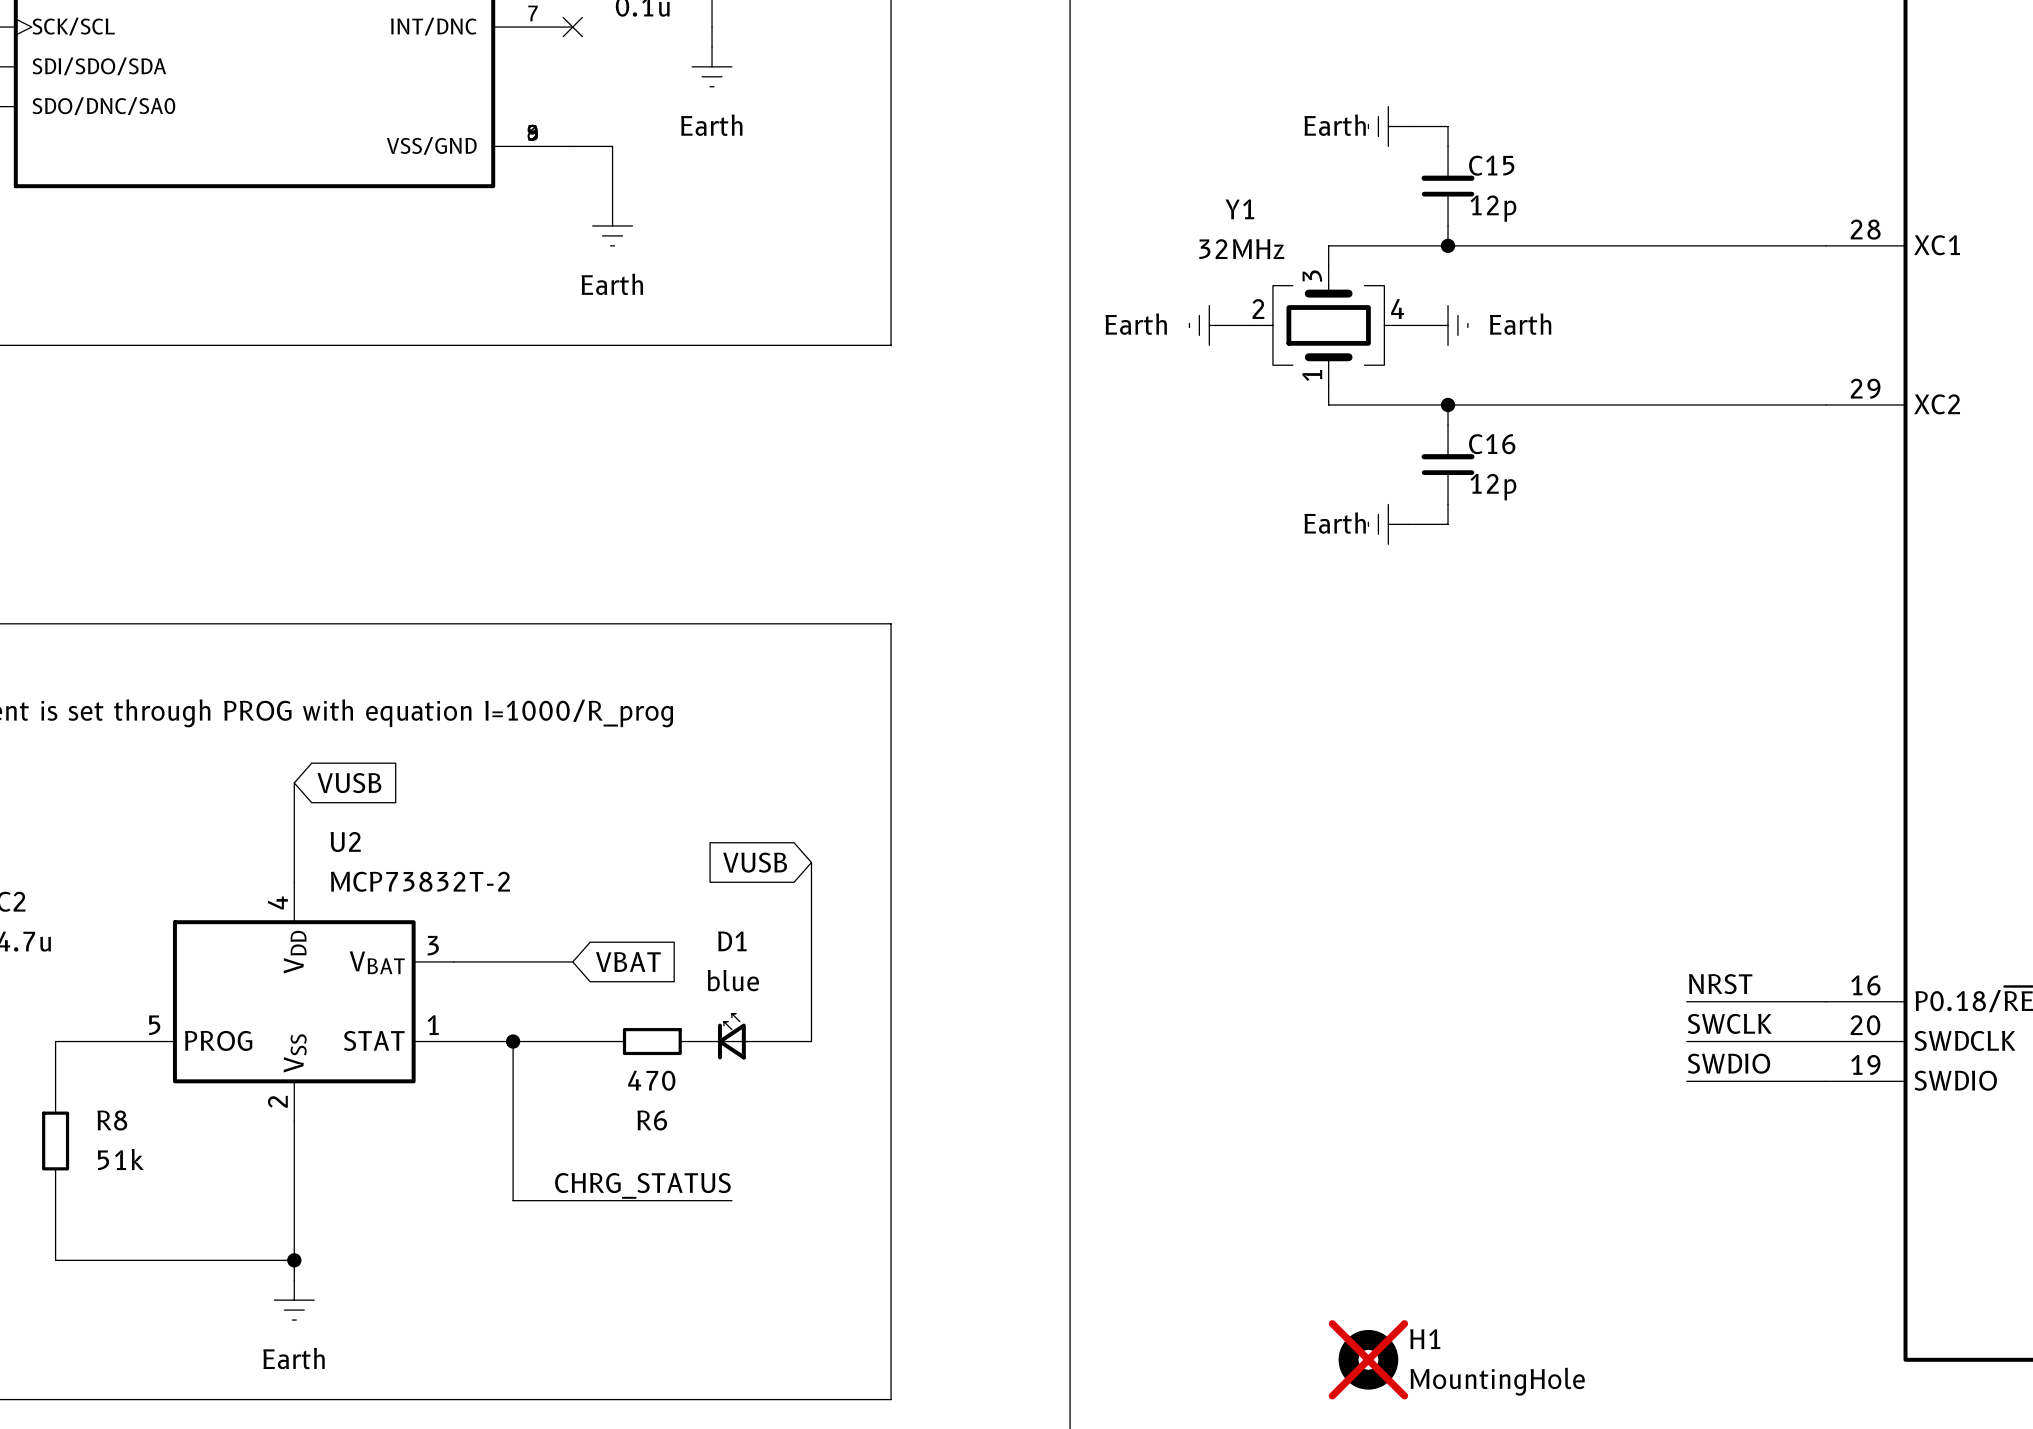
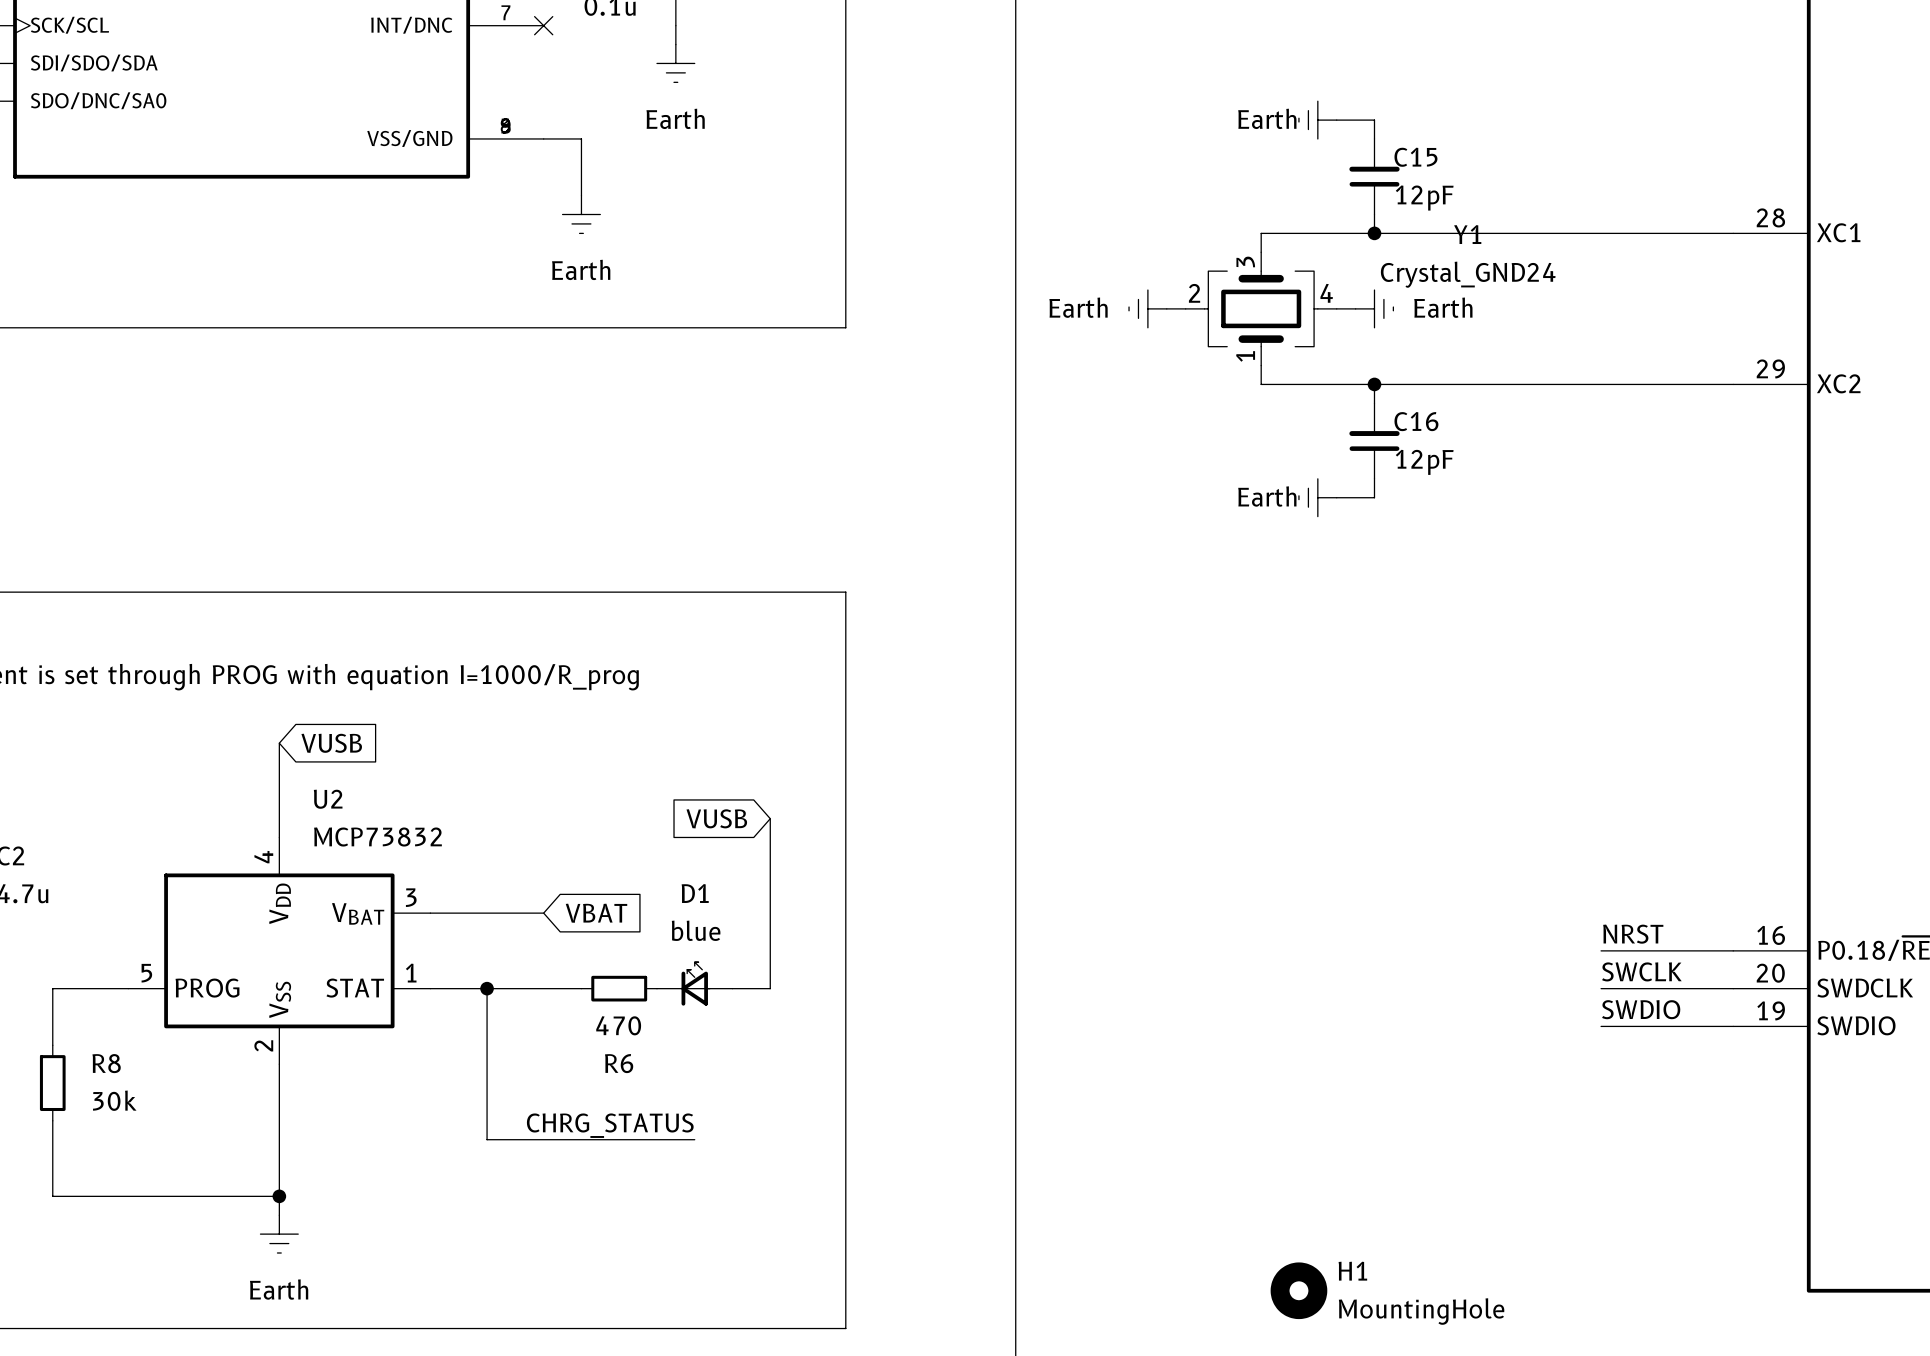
C15 value: 12p (1493, 208) -> 12pF (1424, 198)
Y1 name position: Y1 (1239, 209) -> Y1 (1467, 234)
Y1 value: 32MHz (1241, 249) -> Crystal_GND24 (1468, 274)
C16 value: 12p (1493, 487) -> 12pF (1424, 462)
U2 value: MCP73832T-2 (420, 881) -> MCP73832 (377, 836)
R8 value: 51k (120, 1159) -> 30k (114, 1100)
H1 do-not-place cross: (1368, 1359) -> none

